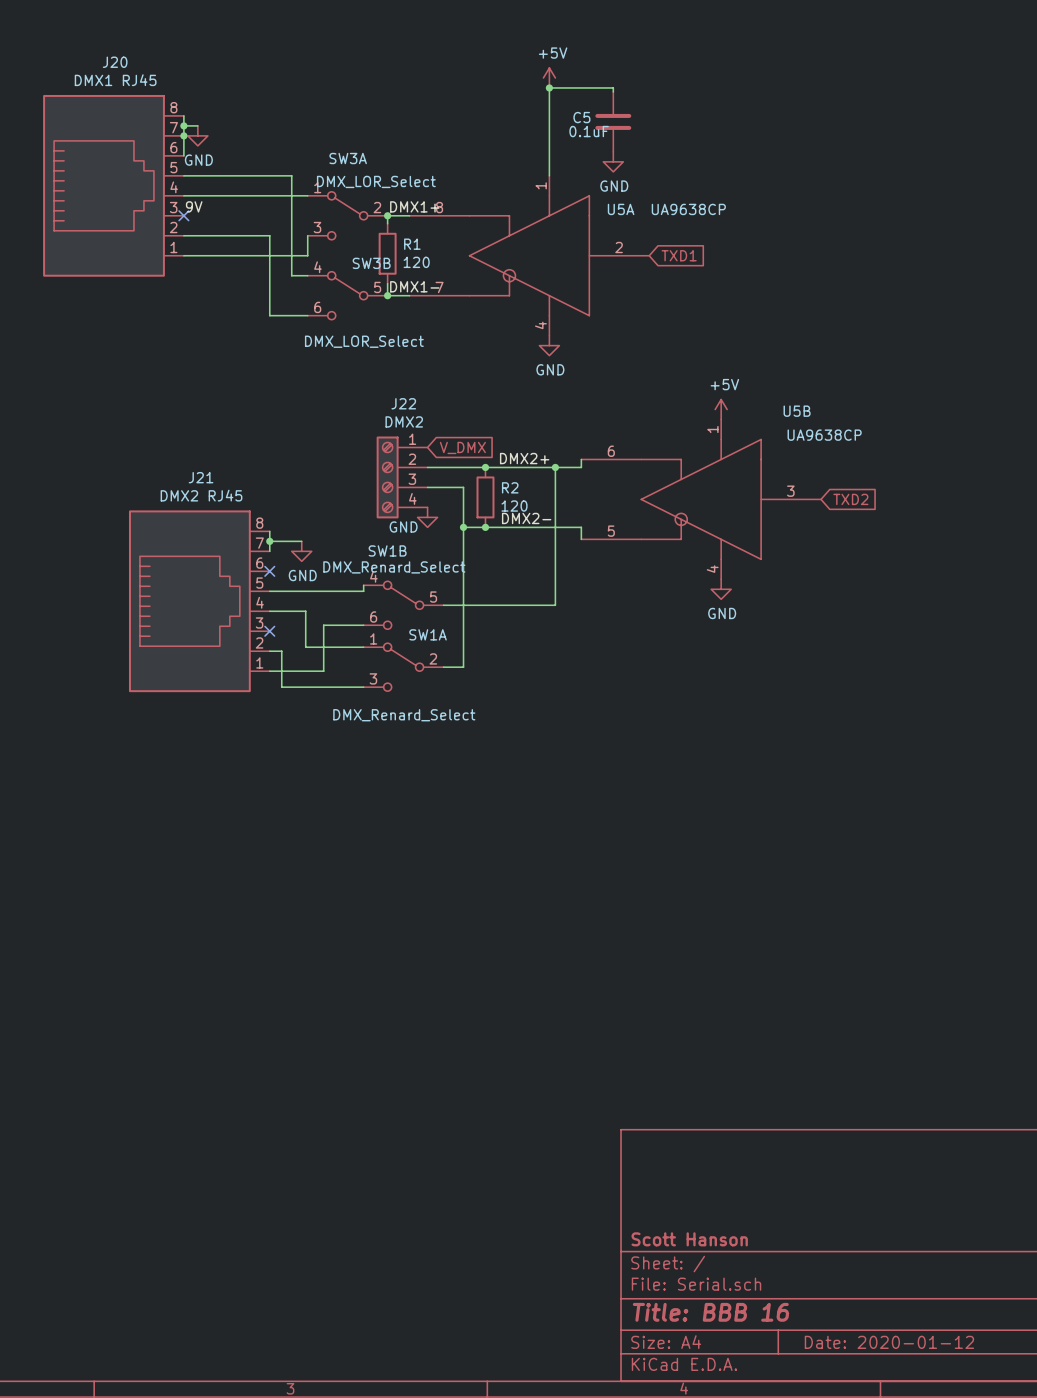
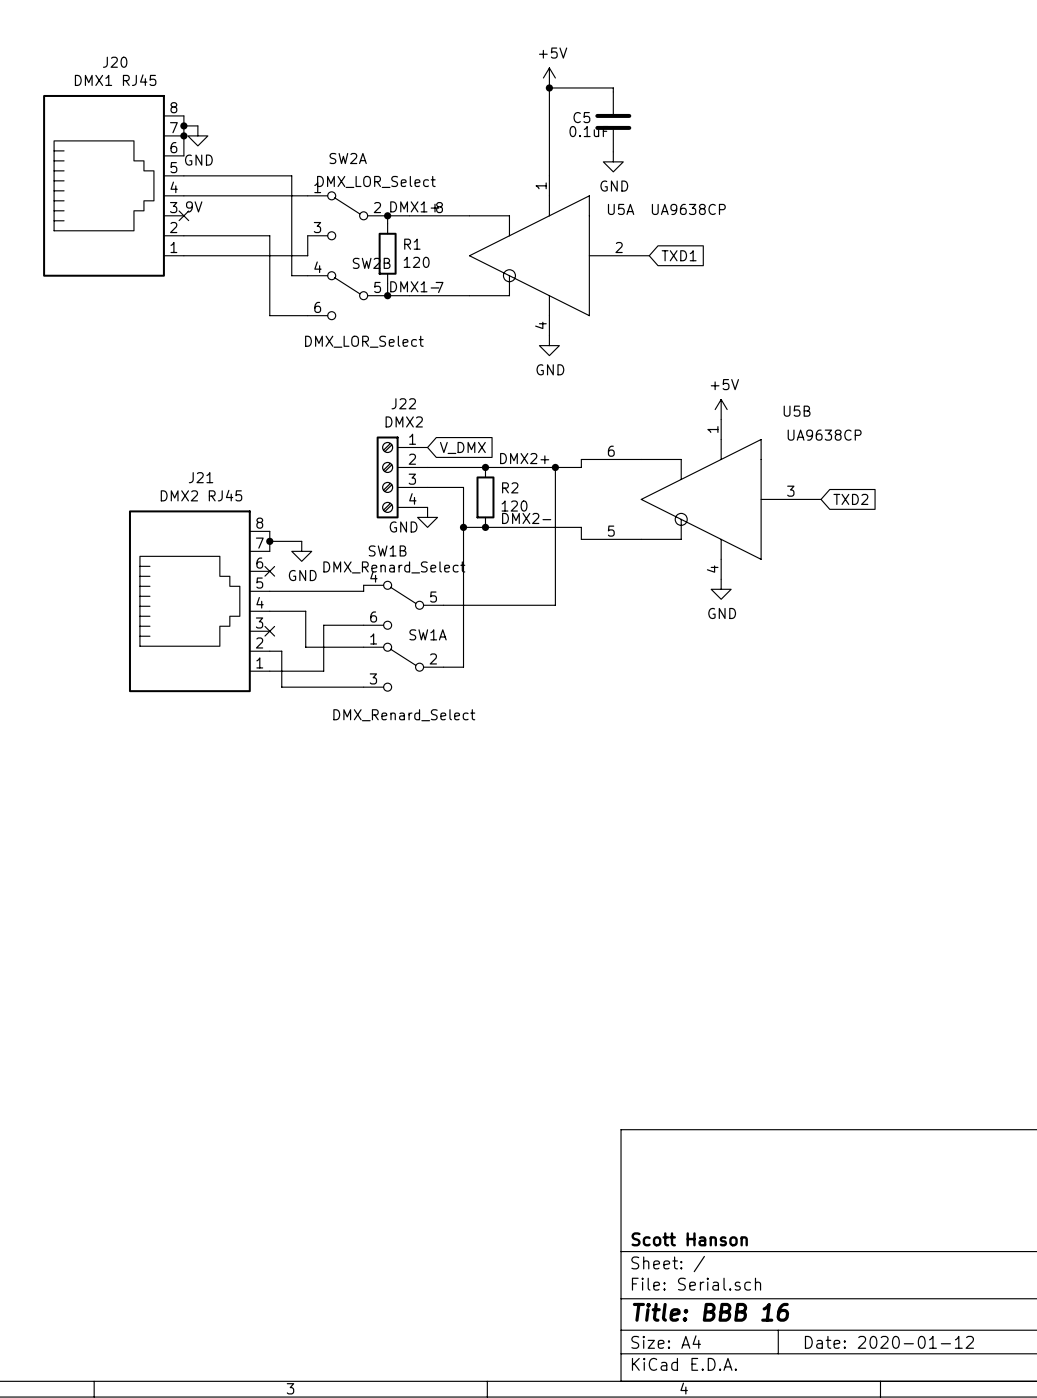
SW3A name: SW3A (348, 158) -> SW2A (348, 158)
SW3B name: SW3B (371, 263) -> SW2B (371, 263)

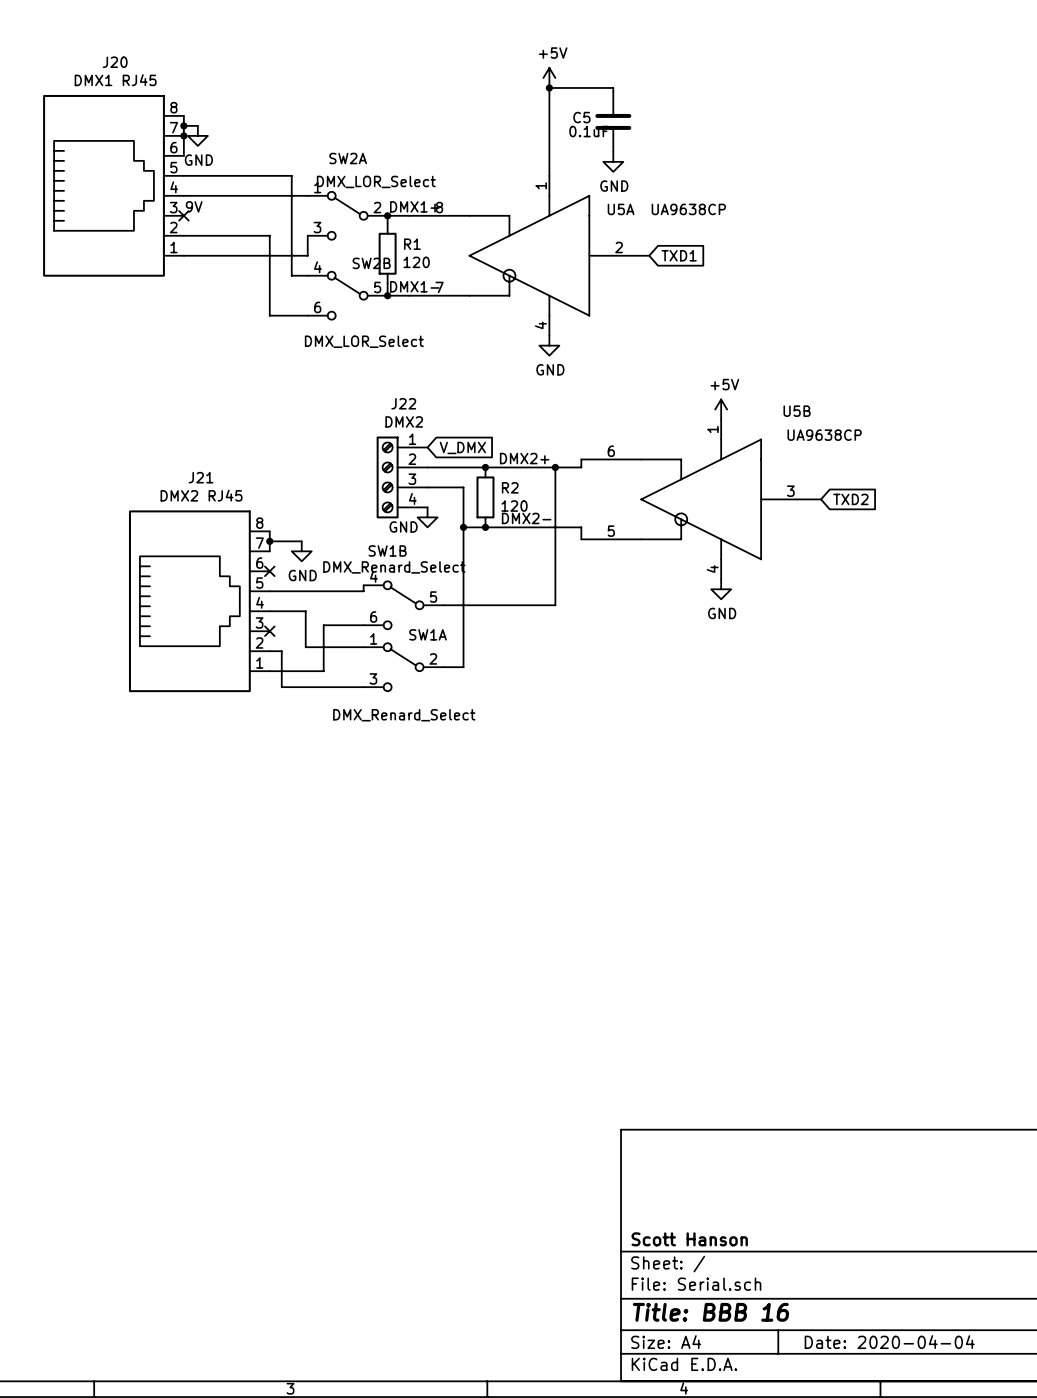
title block: Date: 2020-01-12 (889, 1342) -> Date: 2020-04-04 (889, 1342)

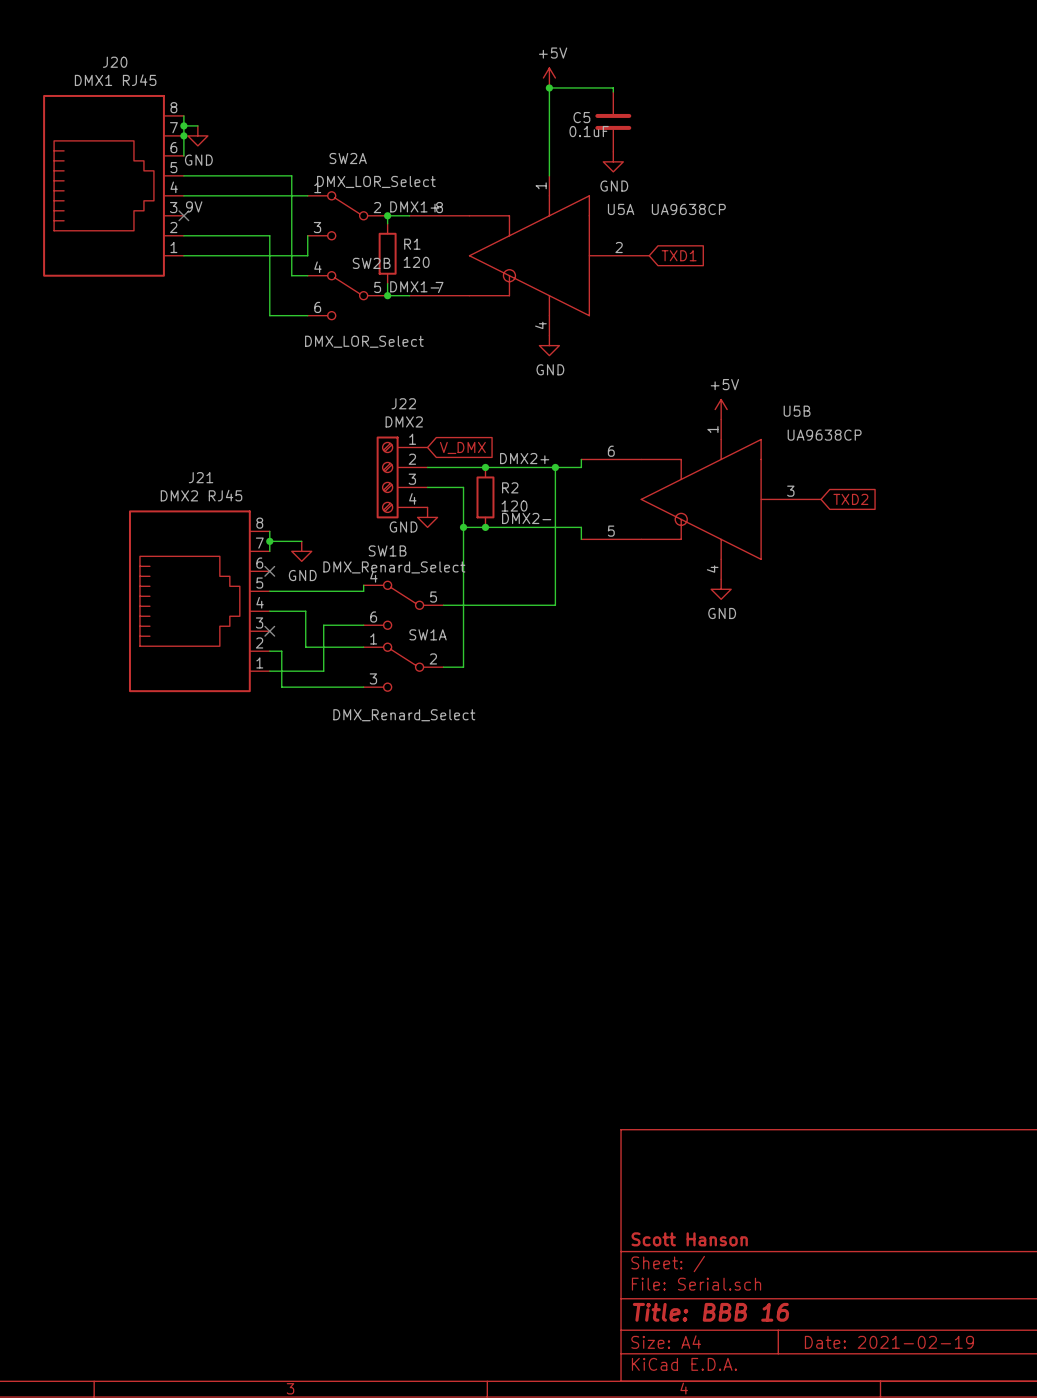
title block: Date: 2020-04-04 (889, 1342) -> Date: 2021-02-19 (889, 1342)

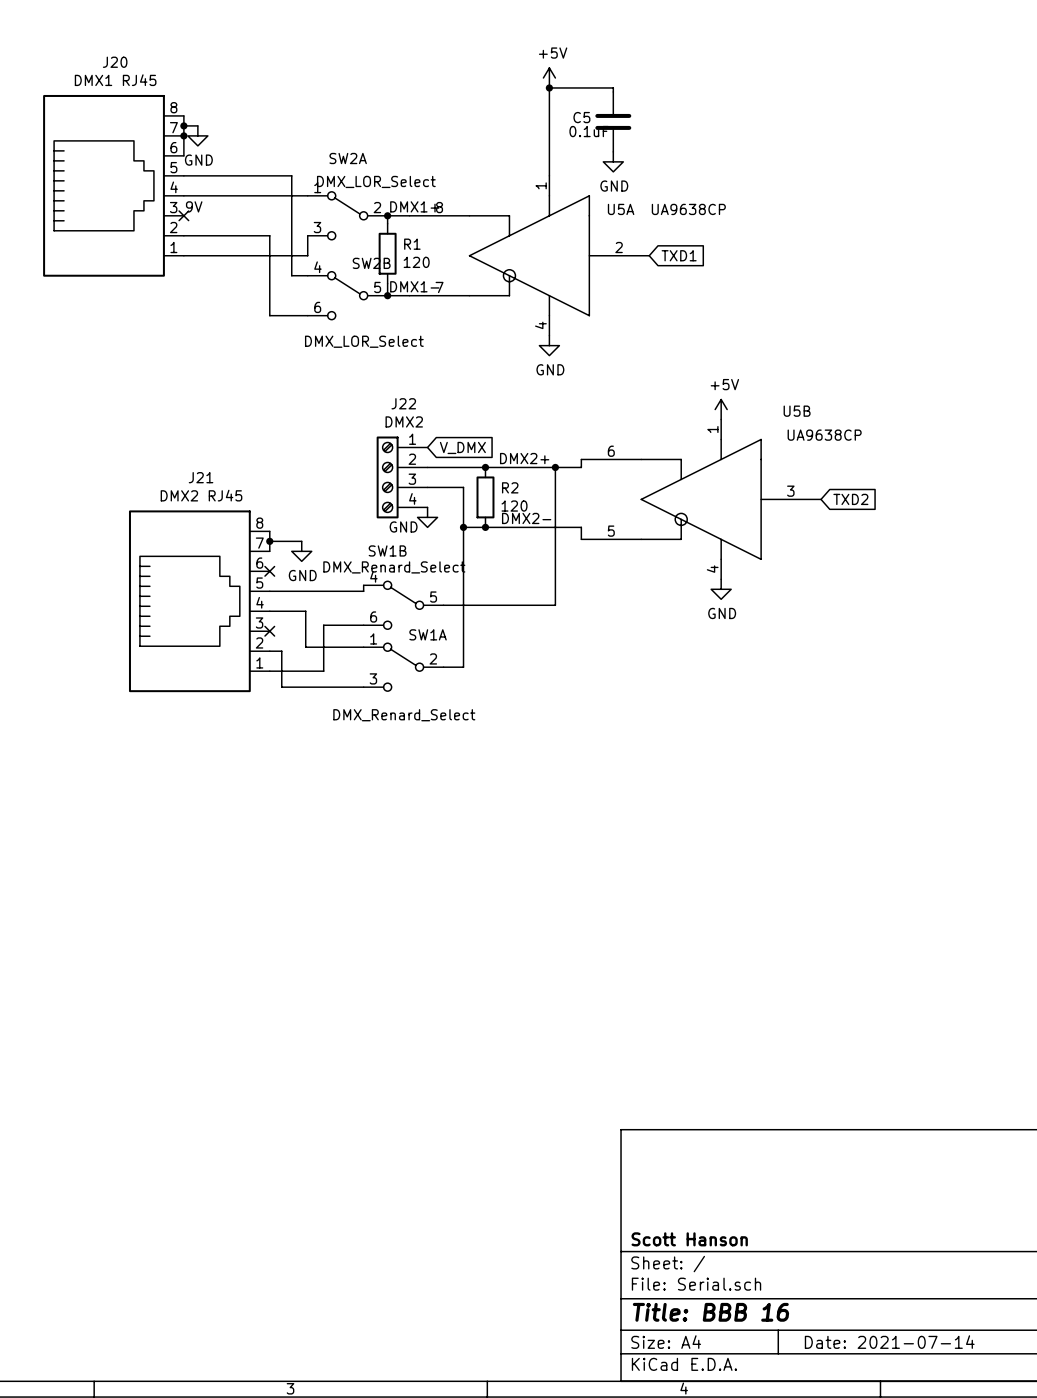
title block: Date: 2021-02-19 (889, 1342) -> Date: 2021-07-14 (889, 1342)

